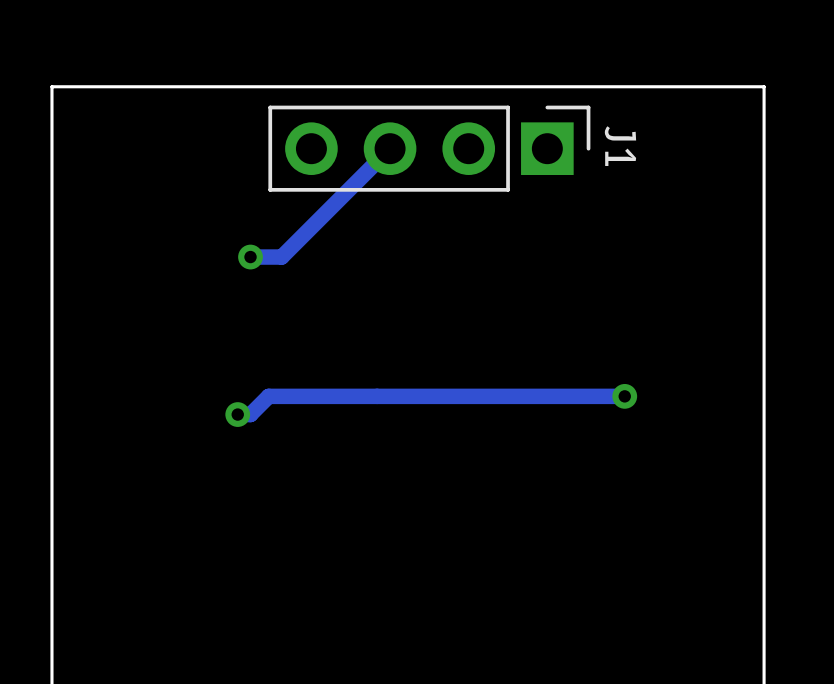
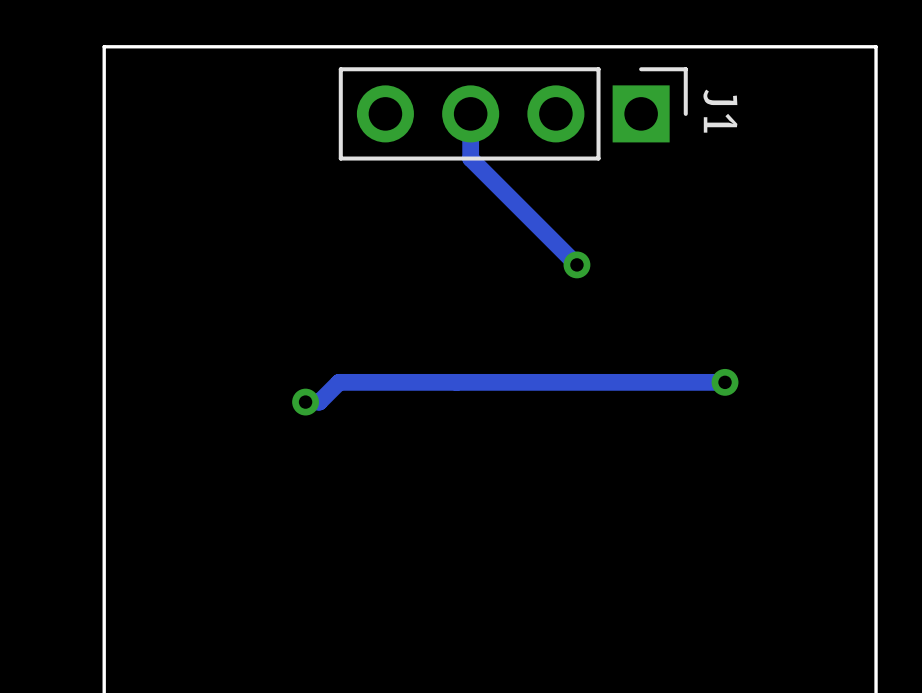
track: (390, 148) (281, 257) (250, 257) -> (470, 113) (470, 158) (576, 264)
via: (250, 257) -> none
via: none -> (576, 264)

